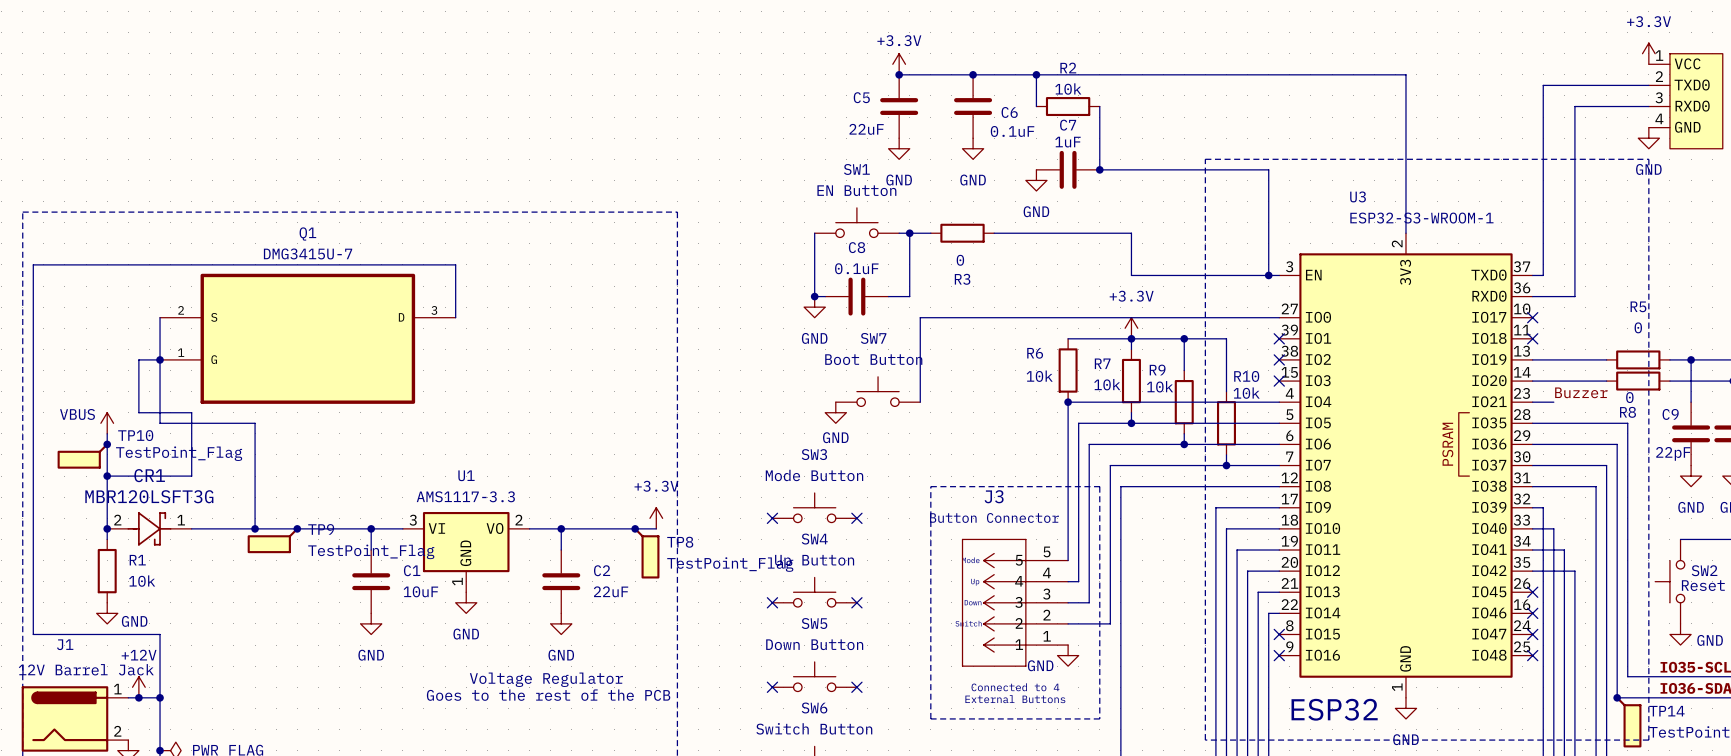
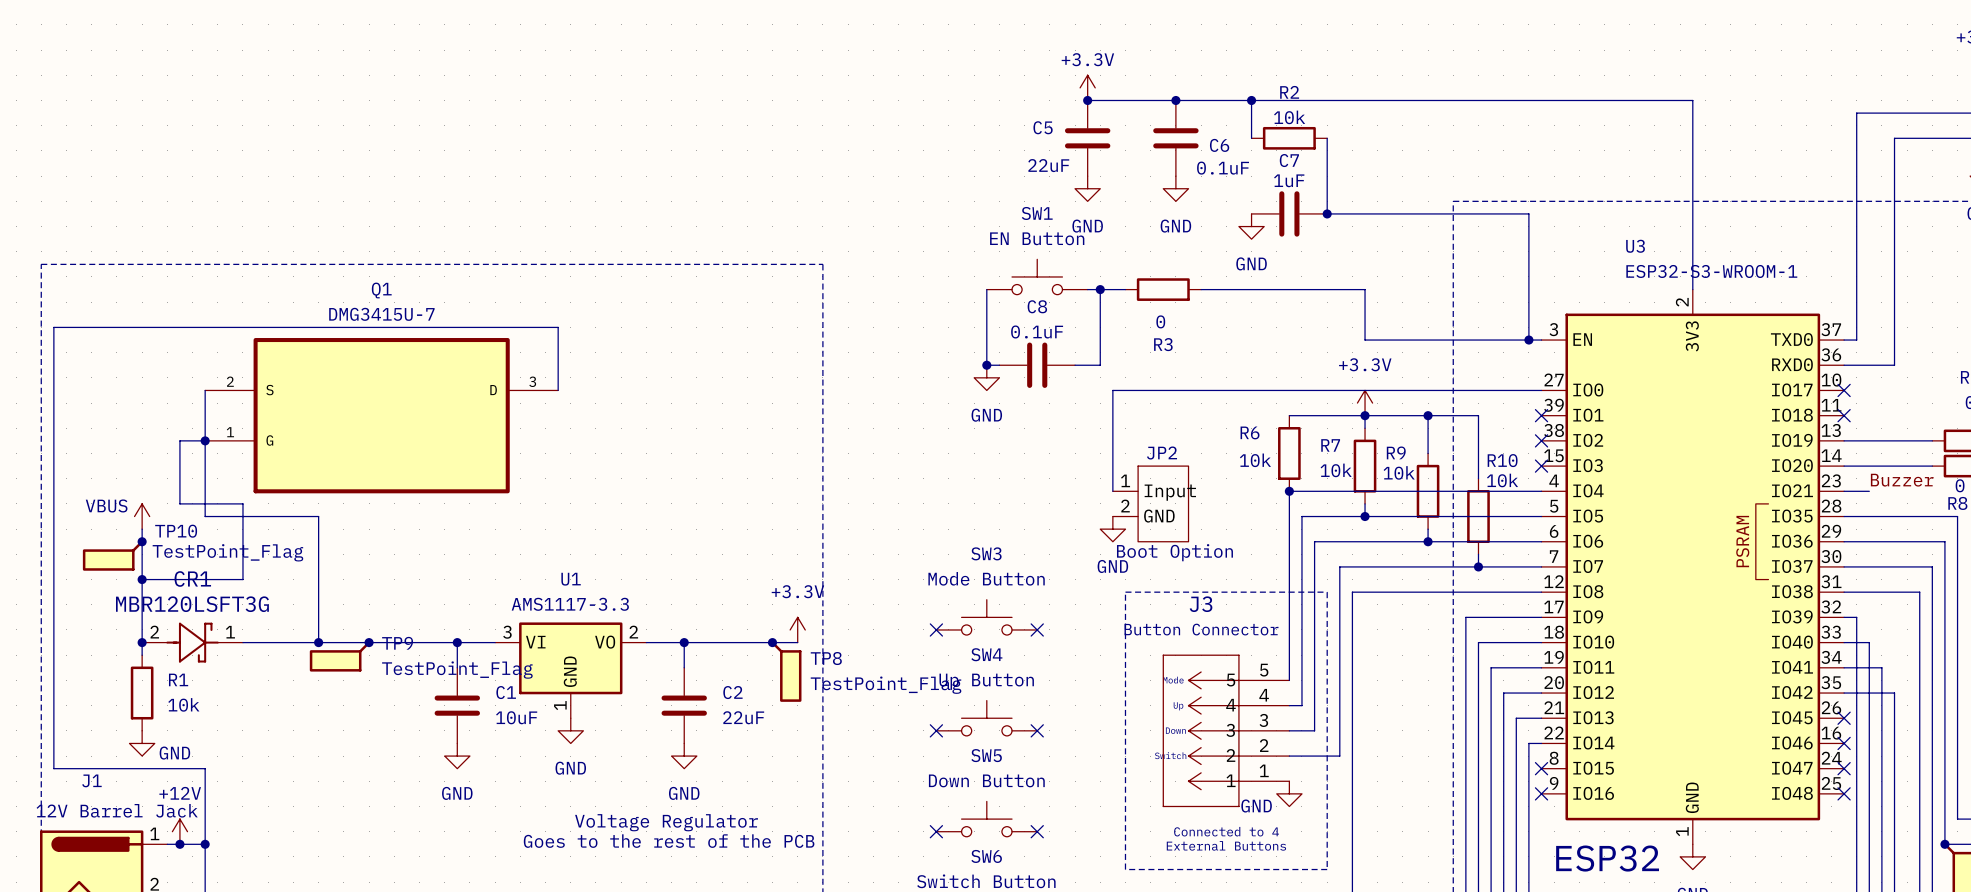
SW7: Boot Button (878, 391) -> none
power symbol position: GND (835, 412) -> GND (1112, 529)
JP2: none -> Boot Option (1150, 503)
power symbol text position: GND (835, 437) -> GND (1112, 566)

